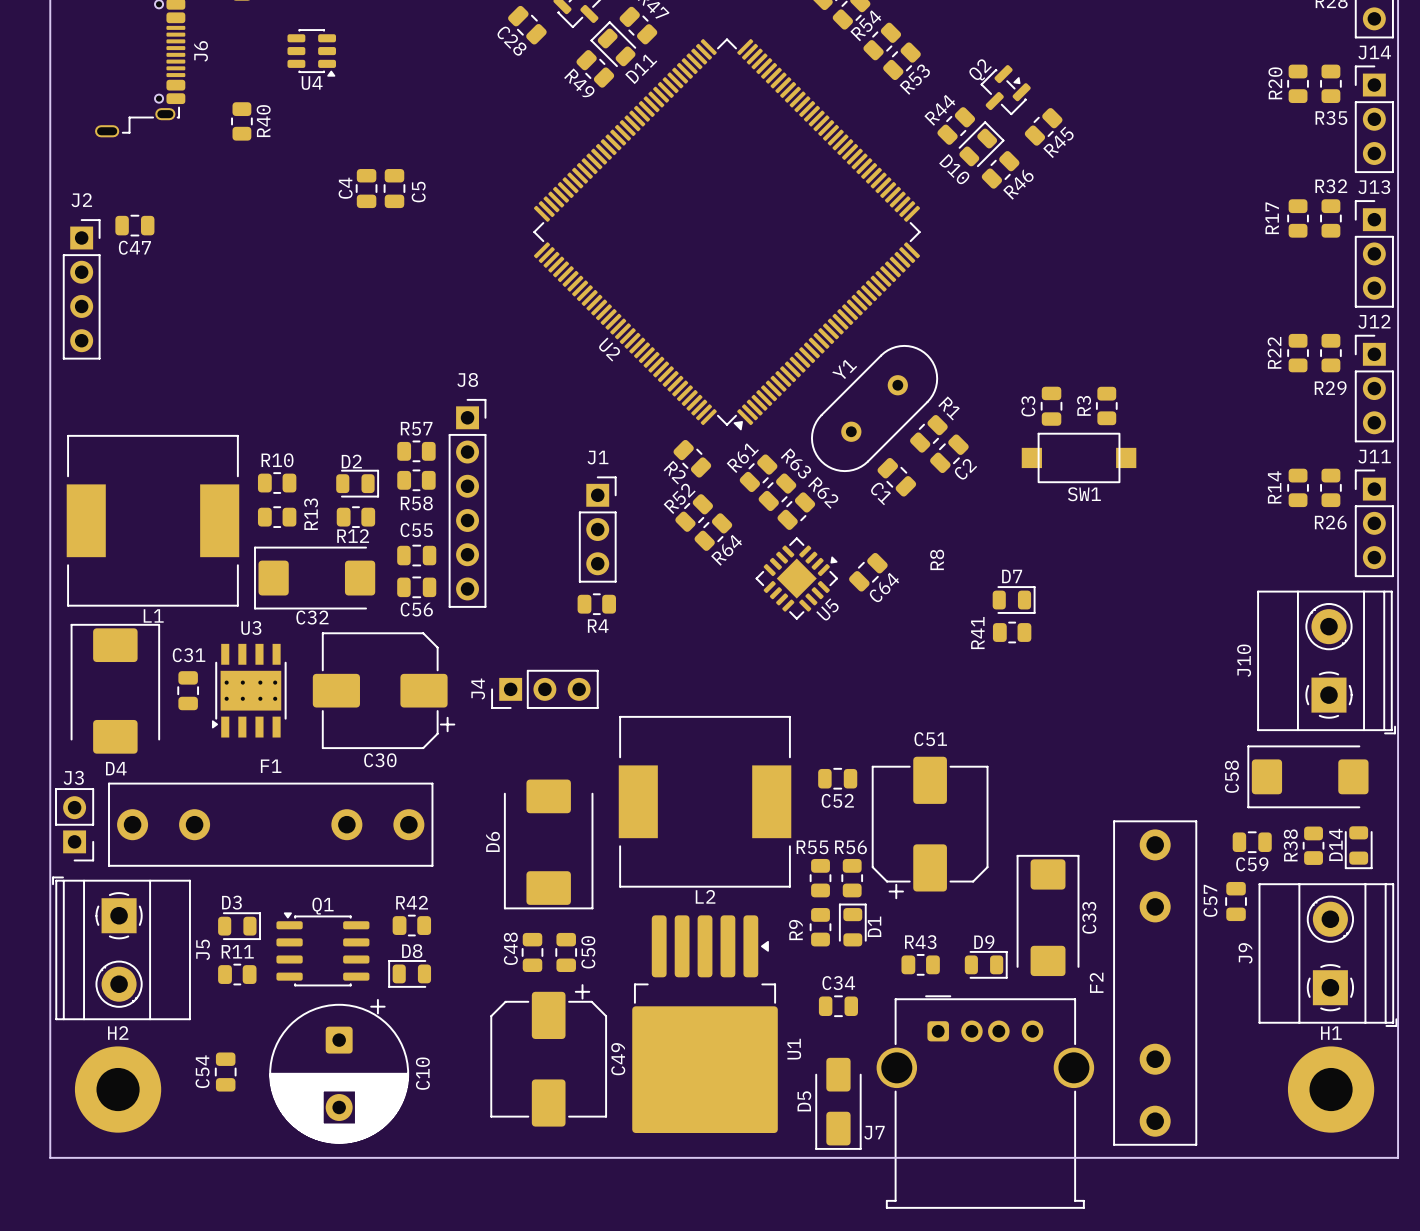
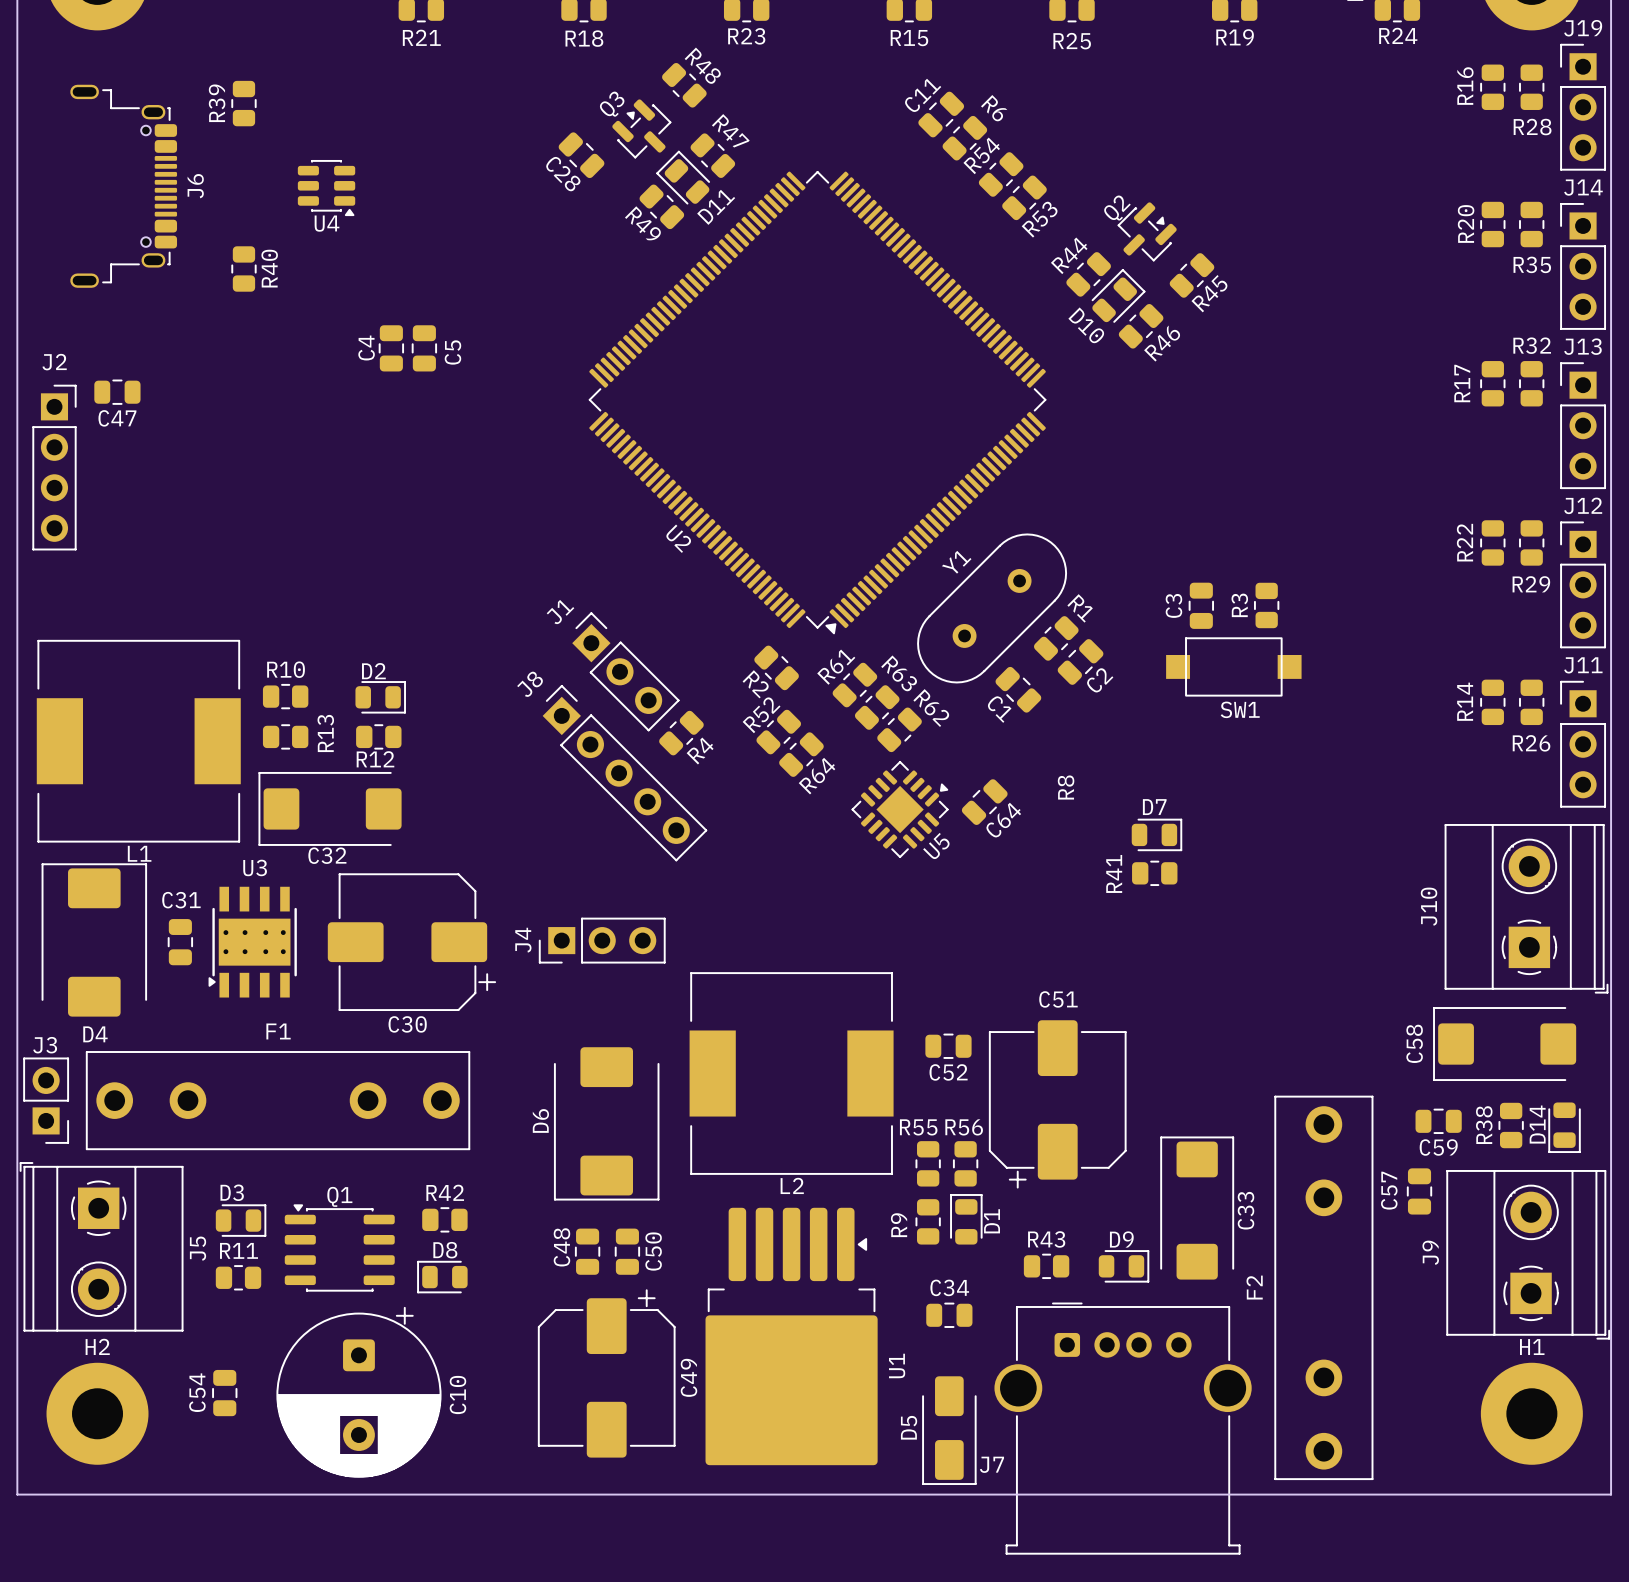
J8 name position: J8 (467, 379) -> J8 (530, 684)
J8 footprint: [448, 399, 487, 608] -> [542, 684, 708, 862]
R57: (416, 451) -> none
R58: (416, 480) -> none
J1 rotation: 0° (597, 529) -> 45° counterclockwise (625, 671)
J1 position: (597, 529) -> (625, 671)
C55: (416, 555) -> none
C56: (416, 587) -> none
R4 rotation: 0° (596, 604) -> 45° counterclockwise (681, 733)
R4 position: (596, 604) -> (681, 733)

